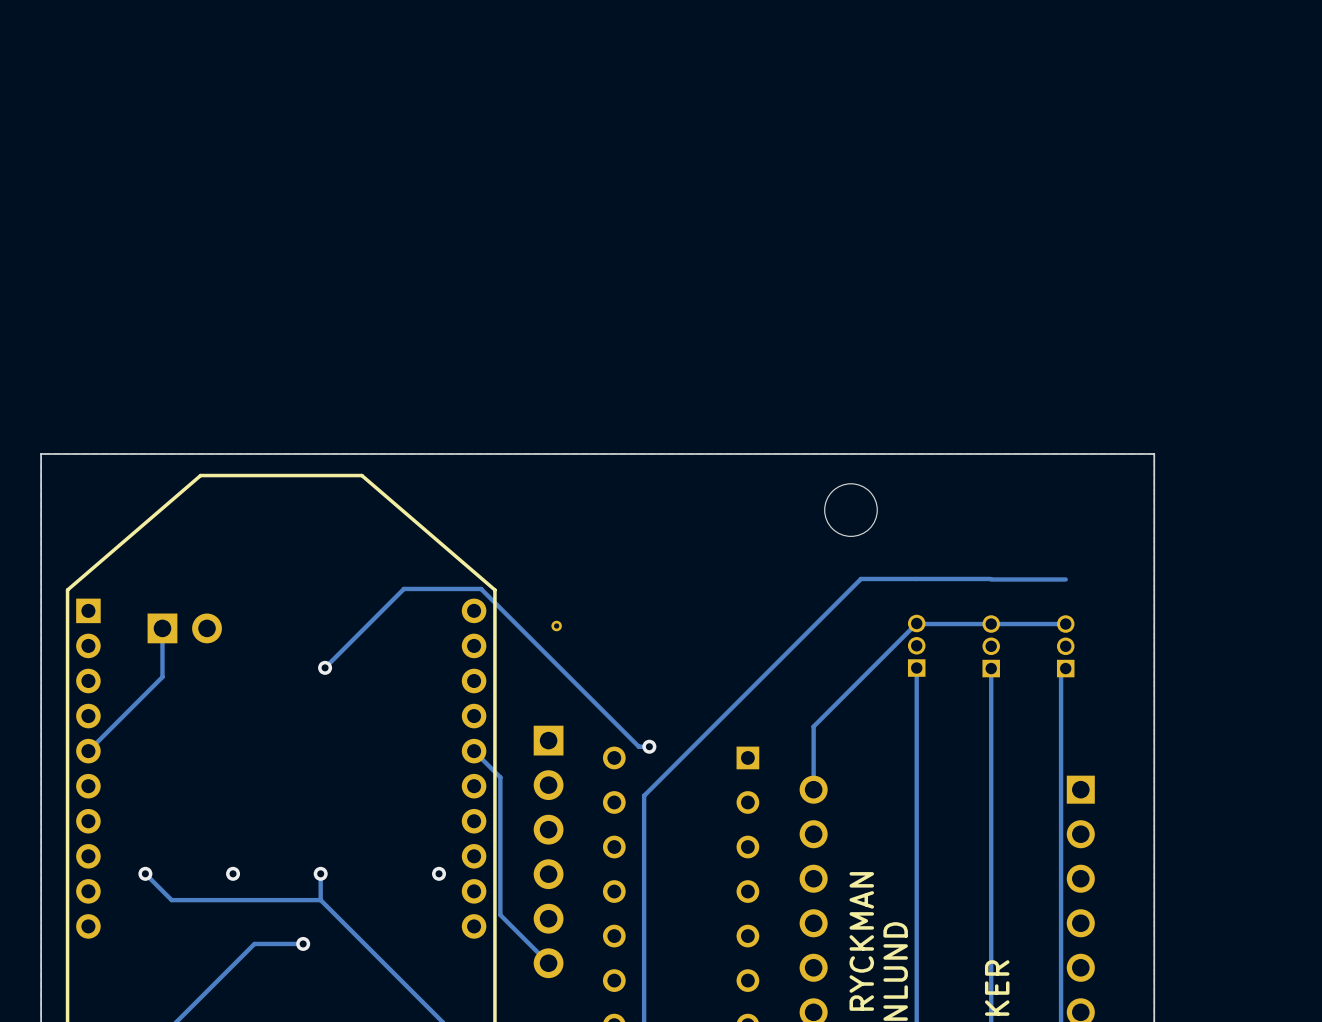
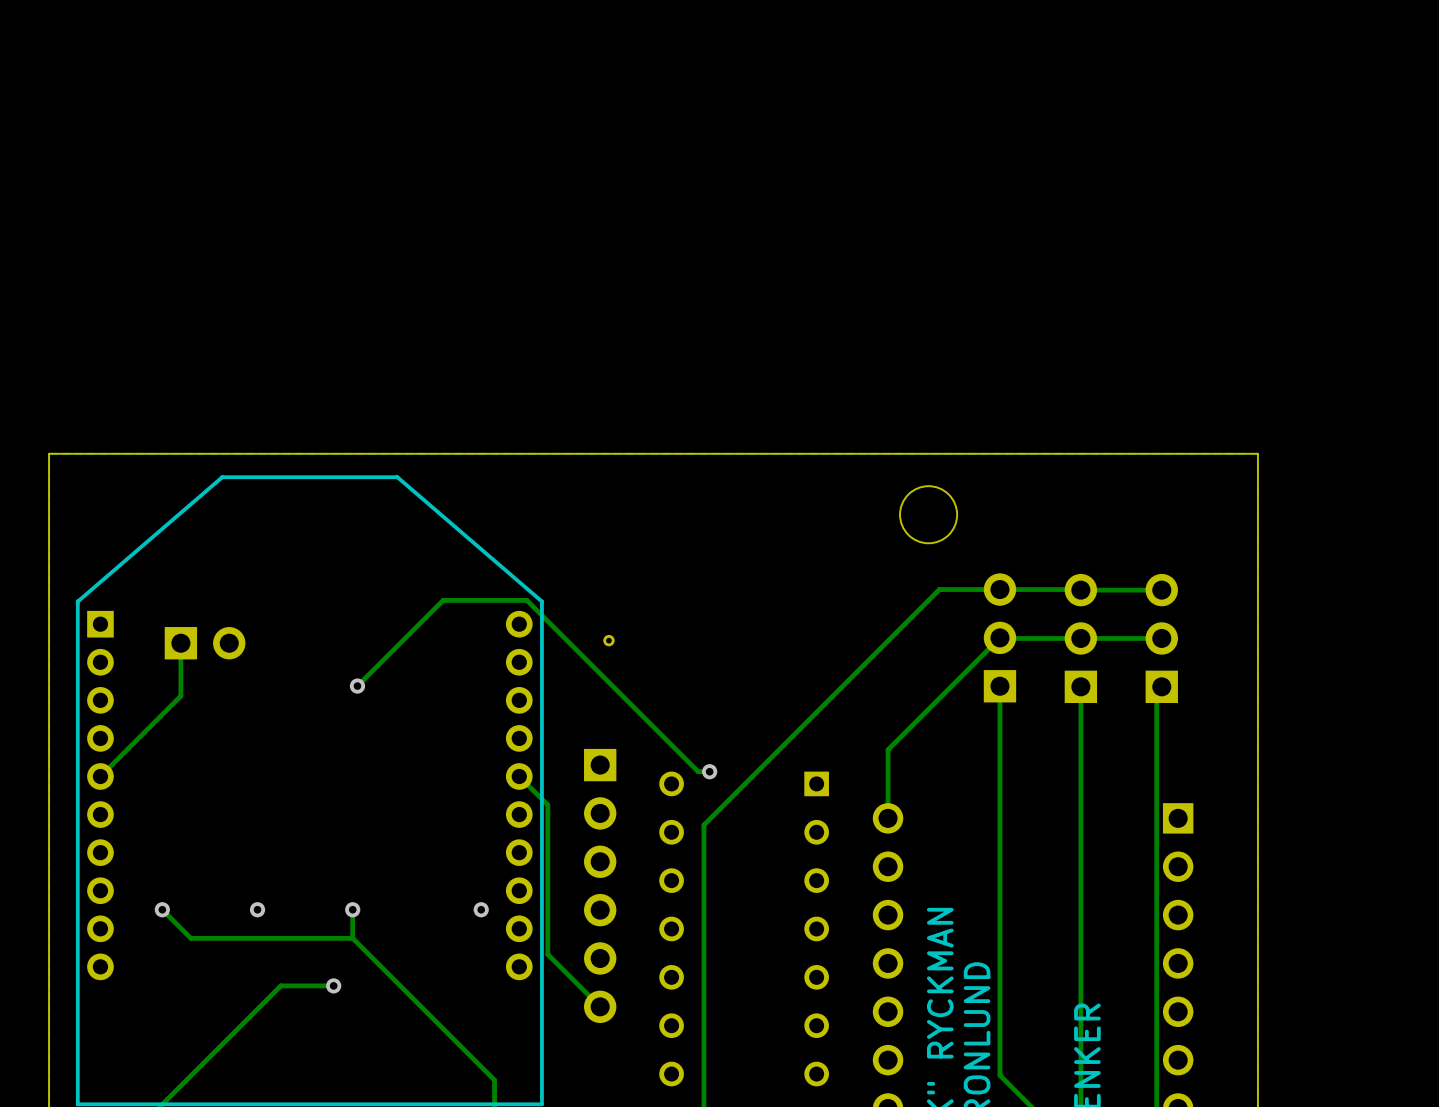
part: none -> (999, 637)
part: none -> (1080, 638)
part: none -> (1161, 638)
part: (916, 645) -> none
part: (991, 646) -> none
part: (1065, 646) -> none

